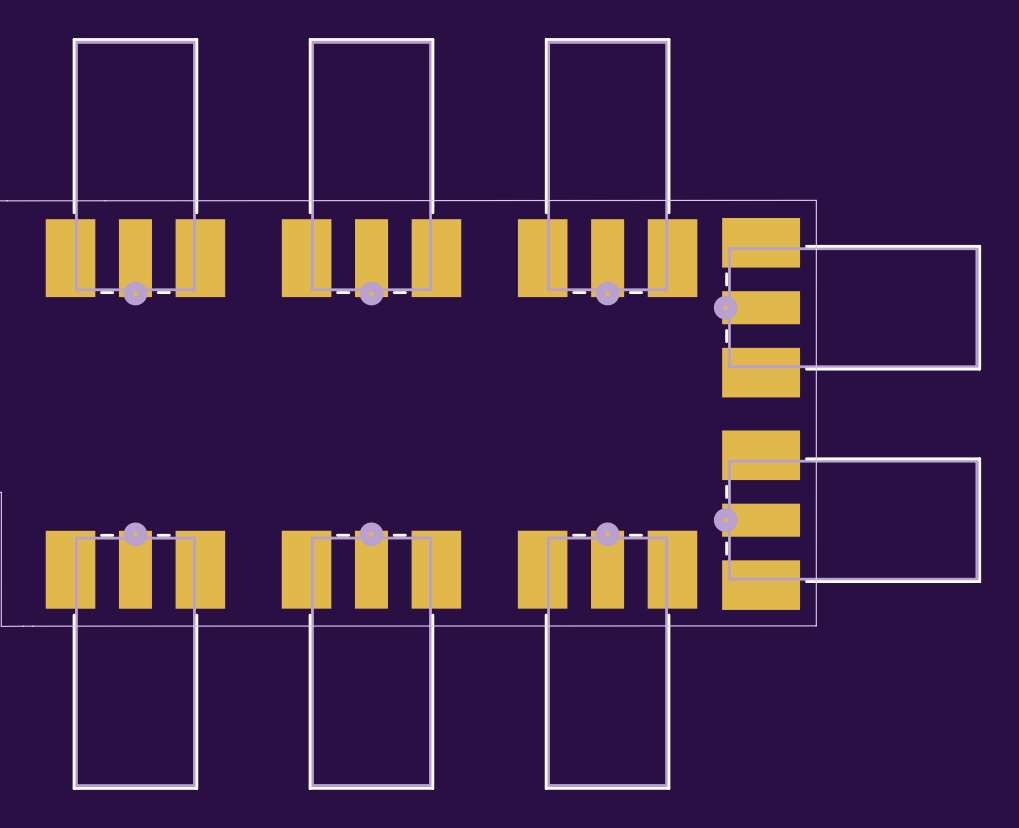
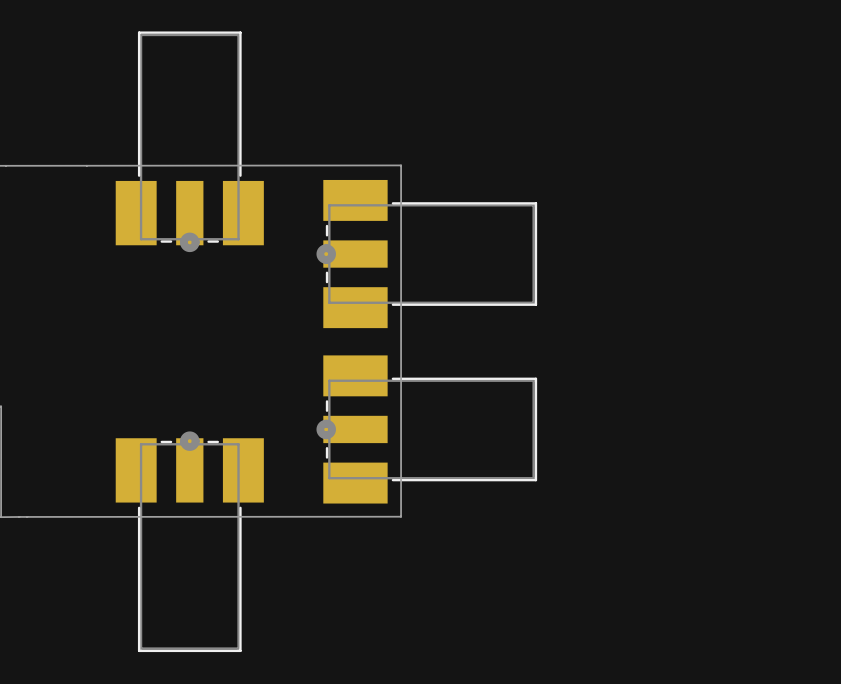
part: (135, 171) -> none
part: none -> (189, 141)
part: (371, 171) -> none
part: (607, 171) -> none
board edge: (105, 200) (816, 200) (816, 625) (33, 626) -> (86, 165) (401, 165) (401, 516) (27, 516)
part: none -> (426, 254)
part: (847, 307) -> none
part: none -> (426, 429)
part: (847, 520) -> none
part: (135, 656) -> none
part: none -> (189, 541)
part: (371, 656) -> none
part: (607, 656) -> none

